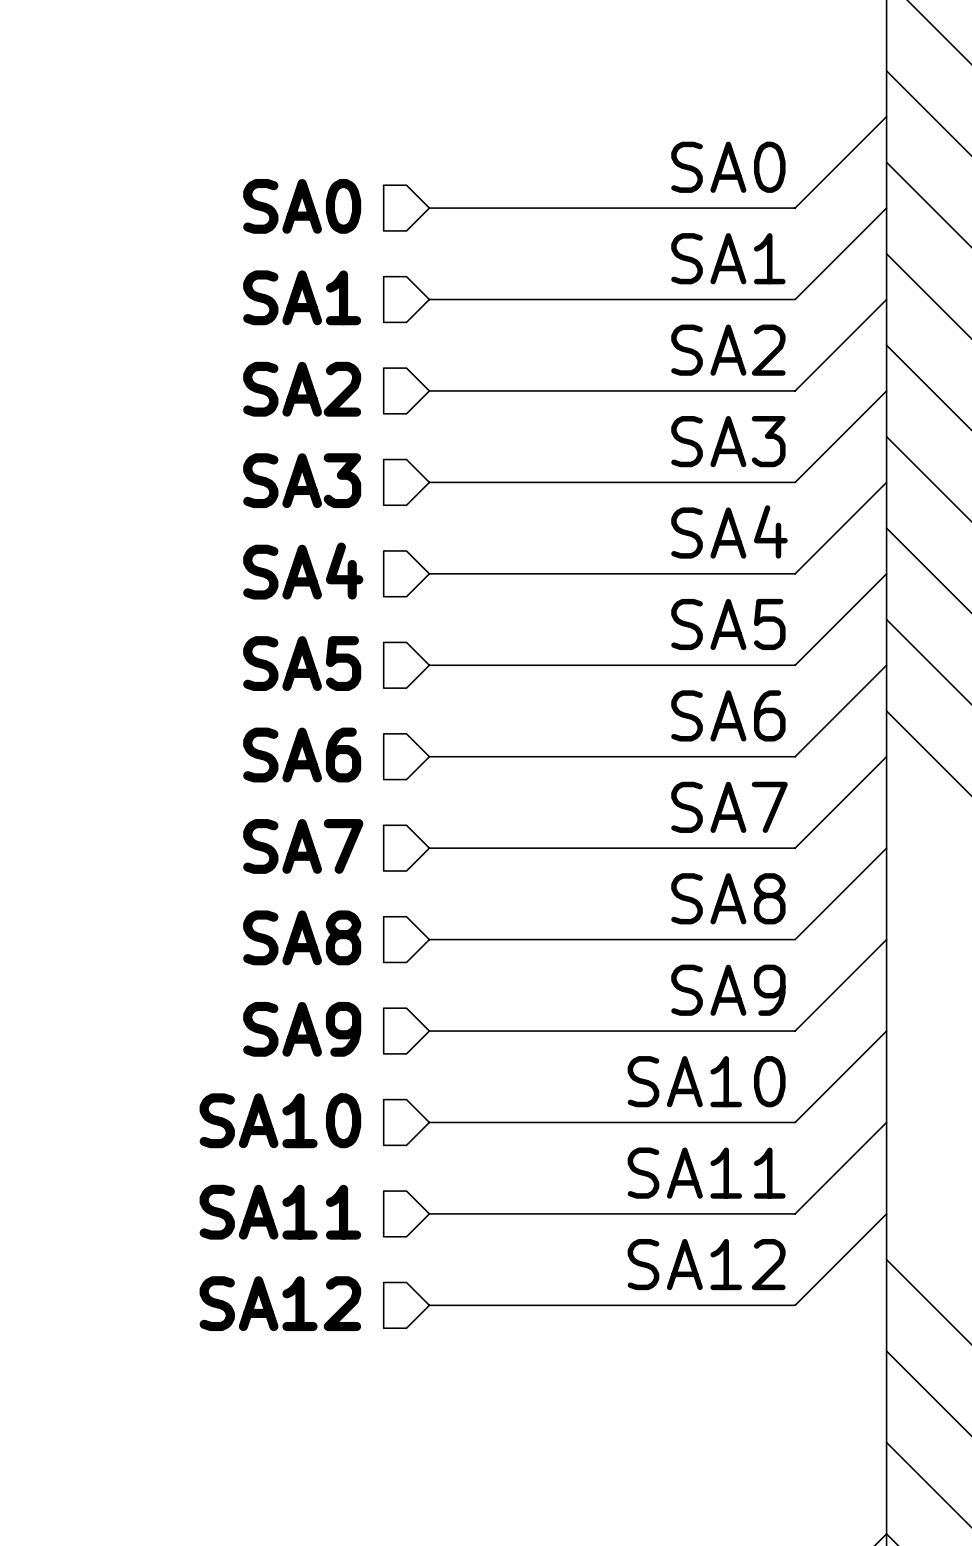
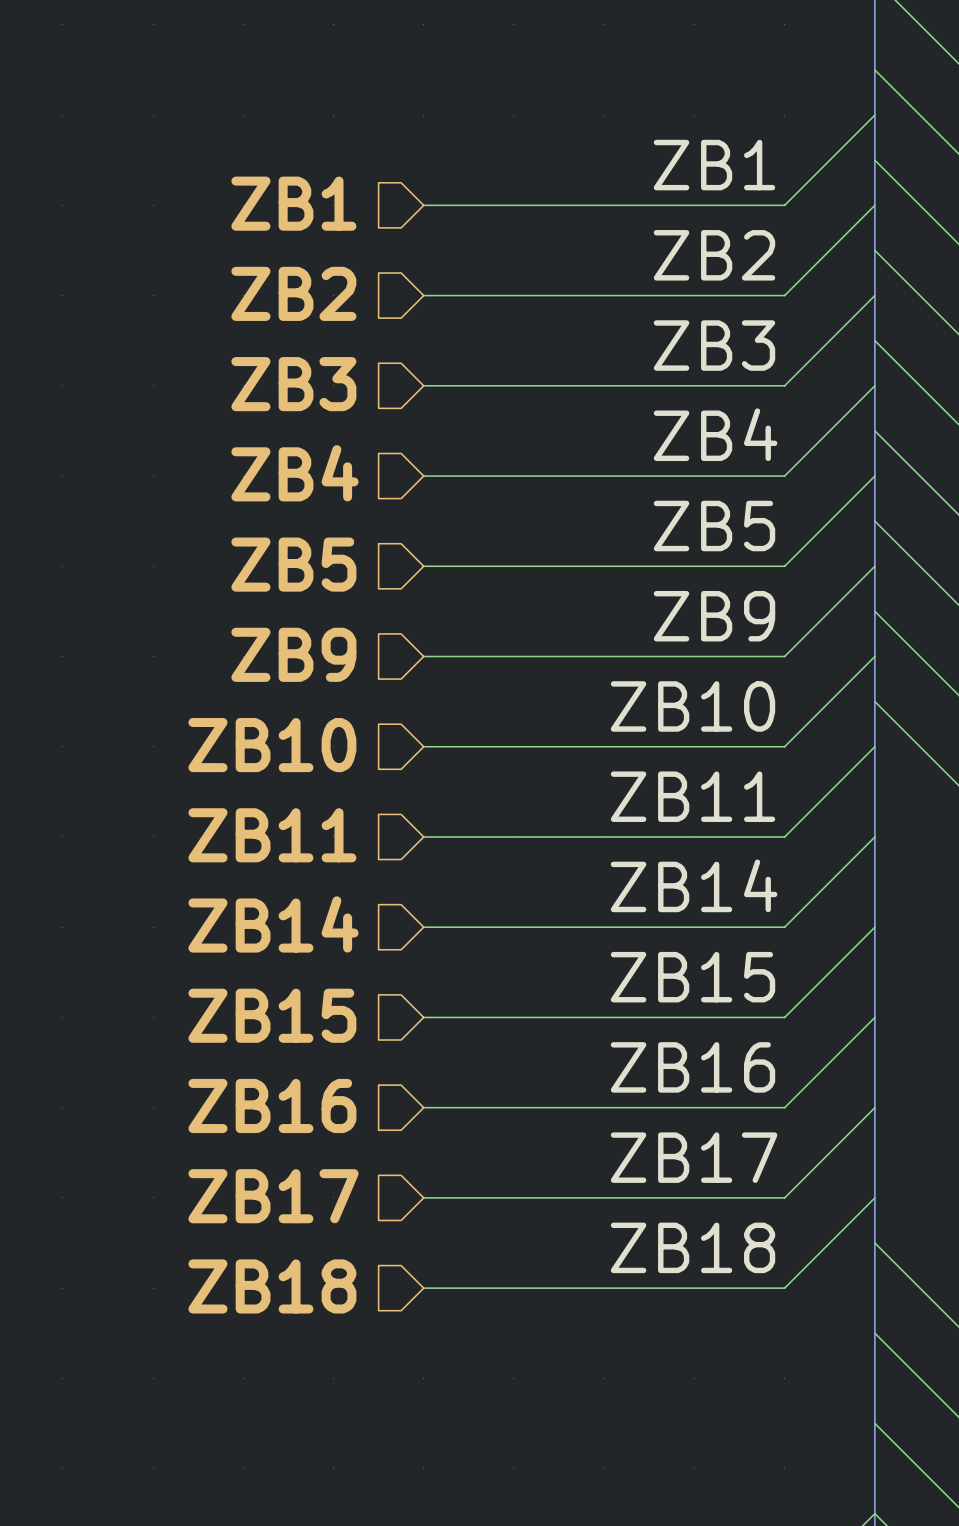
label: SA0 (728, 167) -> ZB1 (714, 165)
hierarchical label: SA0 (302, 206) -> ZB1 (293, 203)
label: SA1 (728, 258) -> ZB2 (714, 255)
hierarchical label: SA1 (302, 297) -> ZB2 (293, 293)
label: SA2 (728, 350) -> ZB3 (714, 345)
hierarchical label: SA2 (302, 389) -> ZB3 (293, 384)
label: SA3 (728, 441) -> ZB4 (715, 434)
hierarchical label: SA3 (302, 480) -> ZB4 (294, 473)
label: SA4 (729, 531) -> ZB5 (714, 526)
hierarchical label: SA4 (303, 571) -> ZB5 (293, 564)
label: SA5 (728, 624) -> ZB9 (714, 616)
hierarchical label: SA5 (302, 663) -> ZB9 (293, 654)
label: SA6 (728, 715) -> ZB10 (693, 706)
hierarchical label: SA6 (302, 755) -> ZB10 (272, 745)
label: SA7 (729, 807) -> ZB11 (693, 796)
hierarchical label: SA7 (303, 846) -> ZB11 (272, 835)
label: SA8 (728, 898) -> ZB14 (694, 885)
hierarchical label: SA8 (302, 937) -> ZB14 (273, 924)
label: SA9 (728, 990) -> ZB15 (693, 977)
hierarchical label: SA9 (302, 1029) -> ZB15 (272, 1015)
label: SA10 (706, 1081) -> ZB16 (693, 1067)
hierarchical label: SA10 (280, 1120) -> ZB16 (272, 1105)
label: SA11 (706, 1173) -> ZB17 (694, 1157)
hierarchical label: SA11 (280, 1212) -> ZB17 (273, 1196)
label: SA12 (706, 1264) -> ZB18 (693, 1247)
hierarchical label: SA12 (280, 1303) -> ZB18 (272, 1286)

